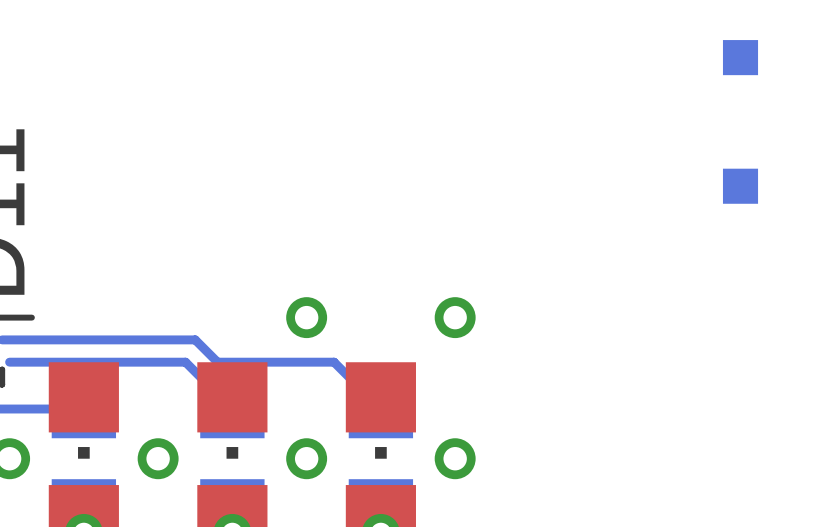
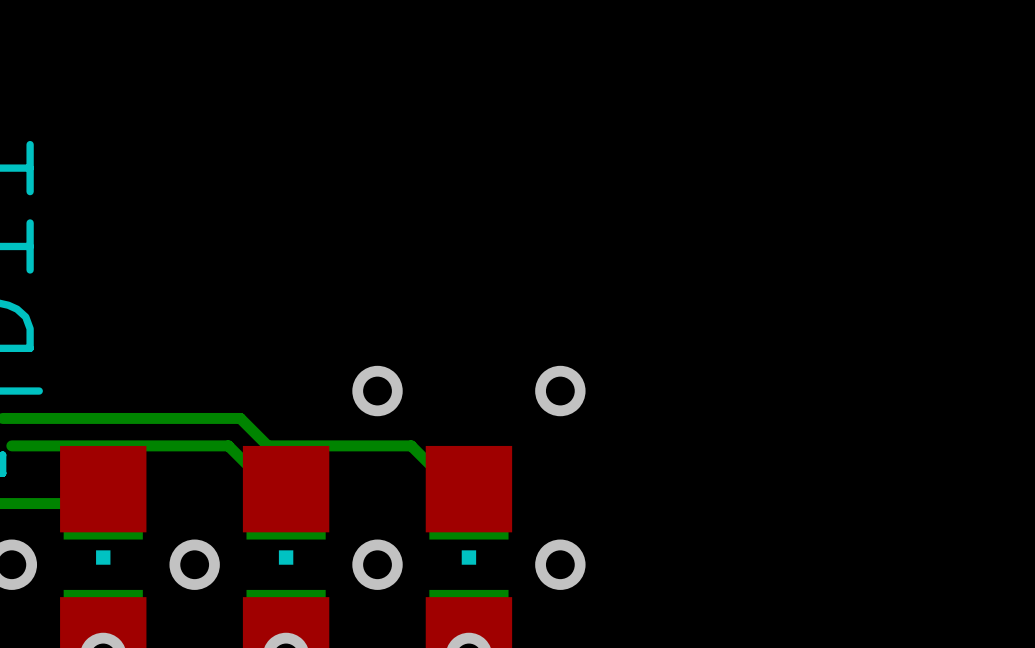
part: (740, 121) -> none

